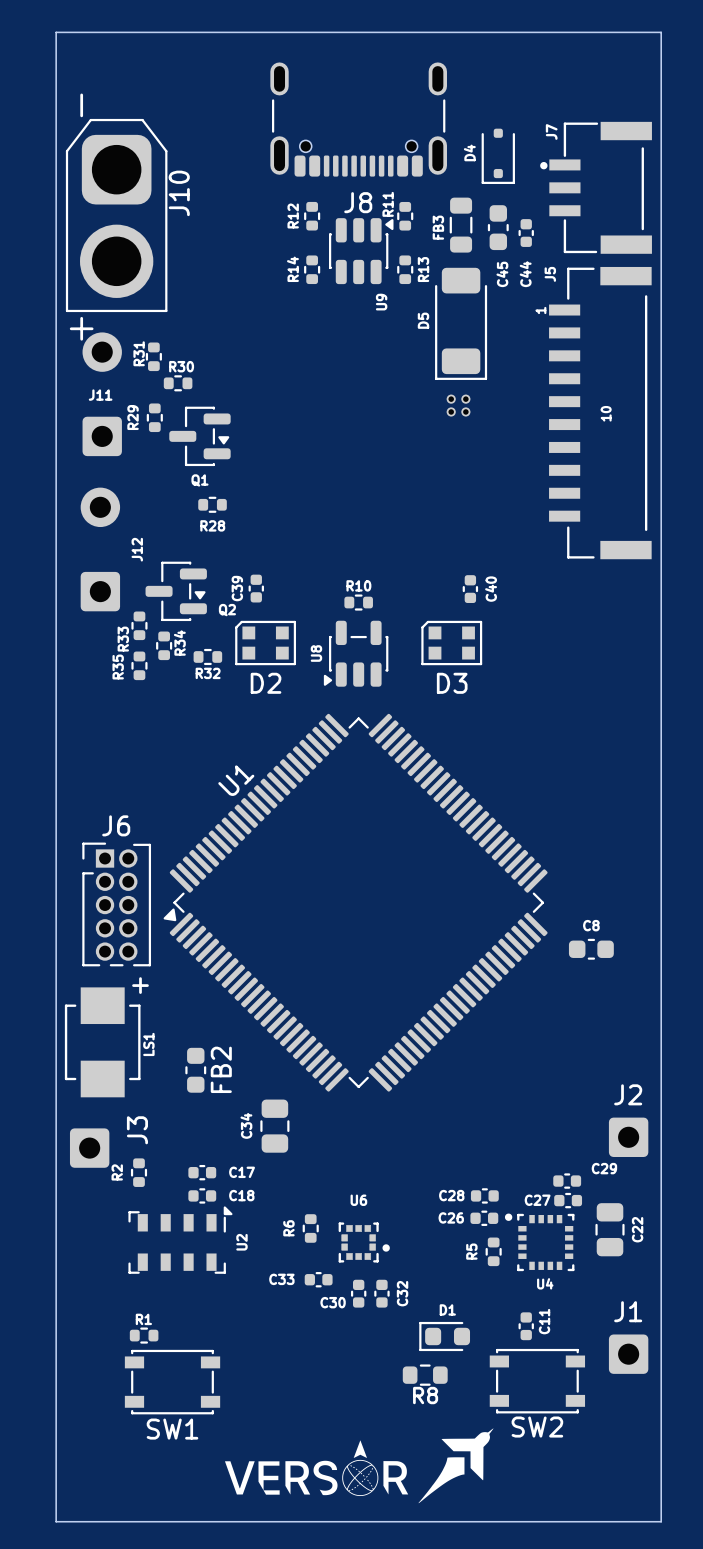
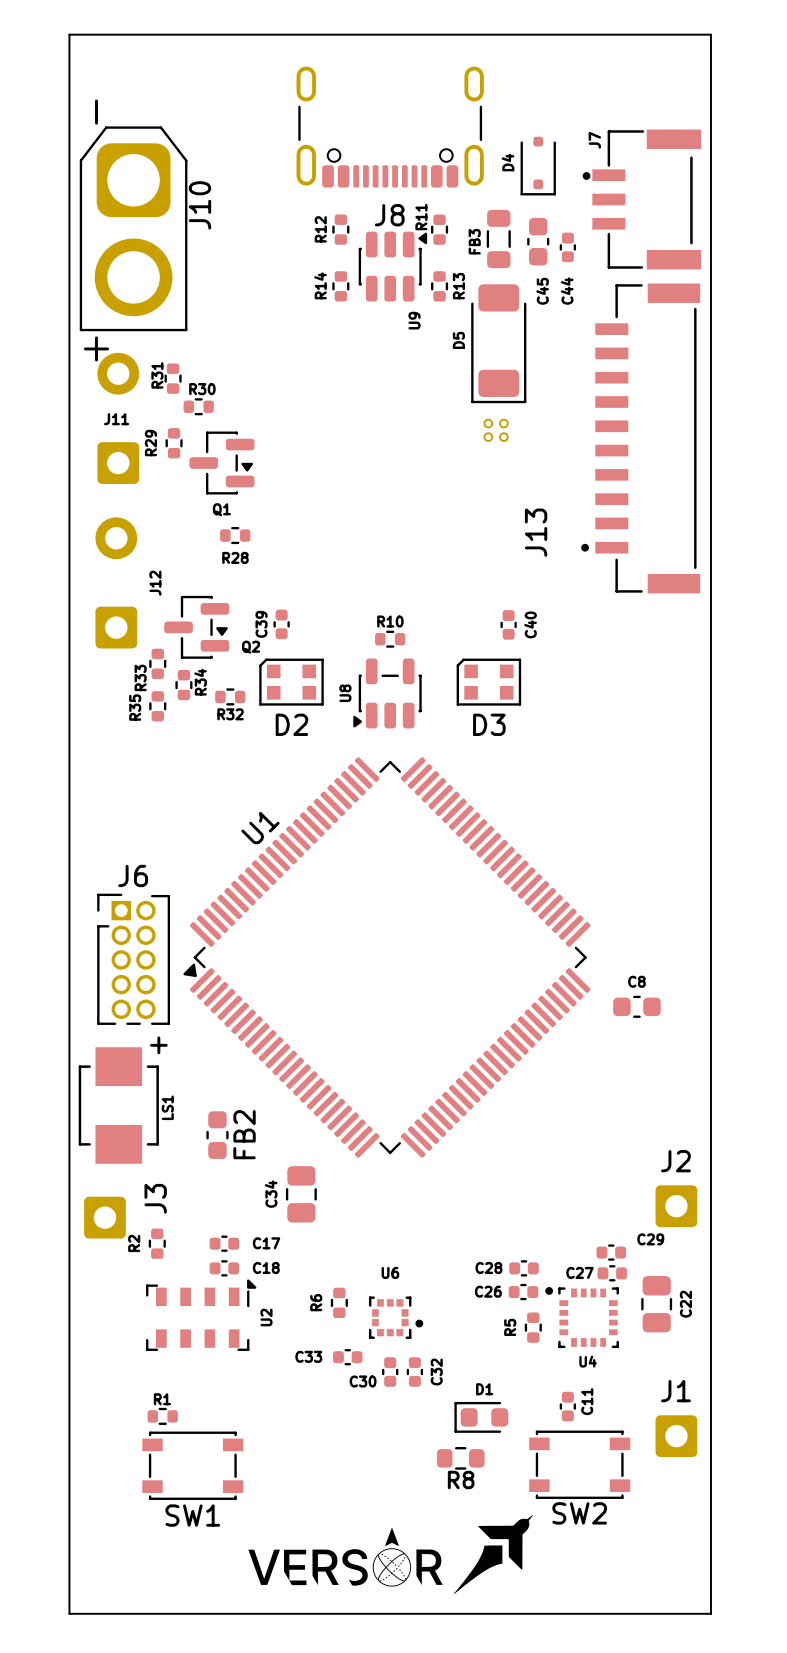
J13: none -> (640, 438)
J5: (600, 413) -> none

